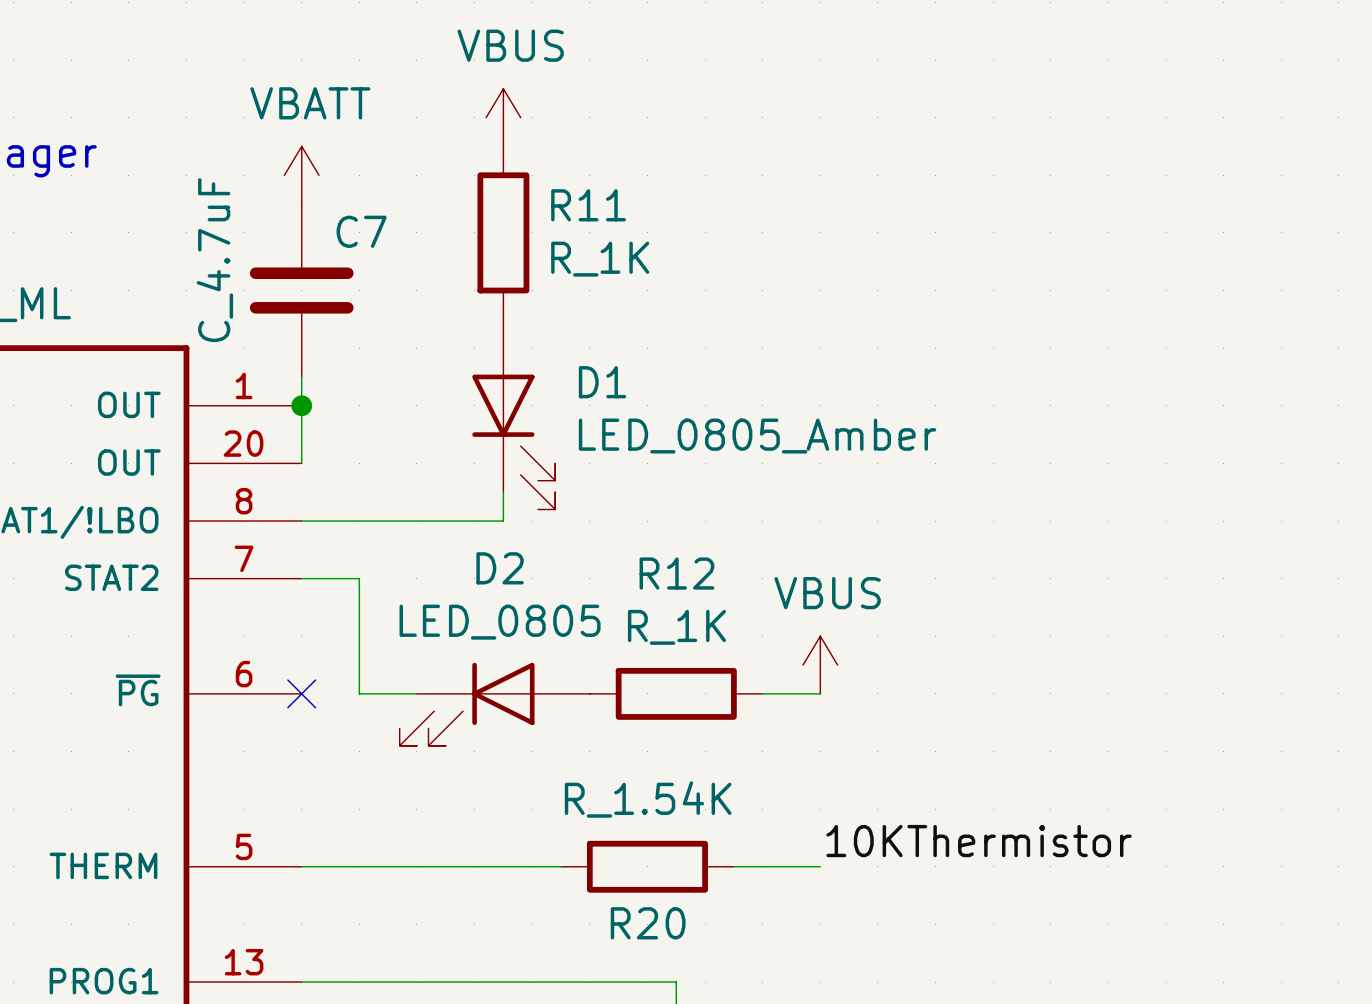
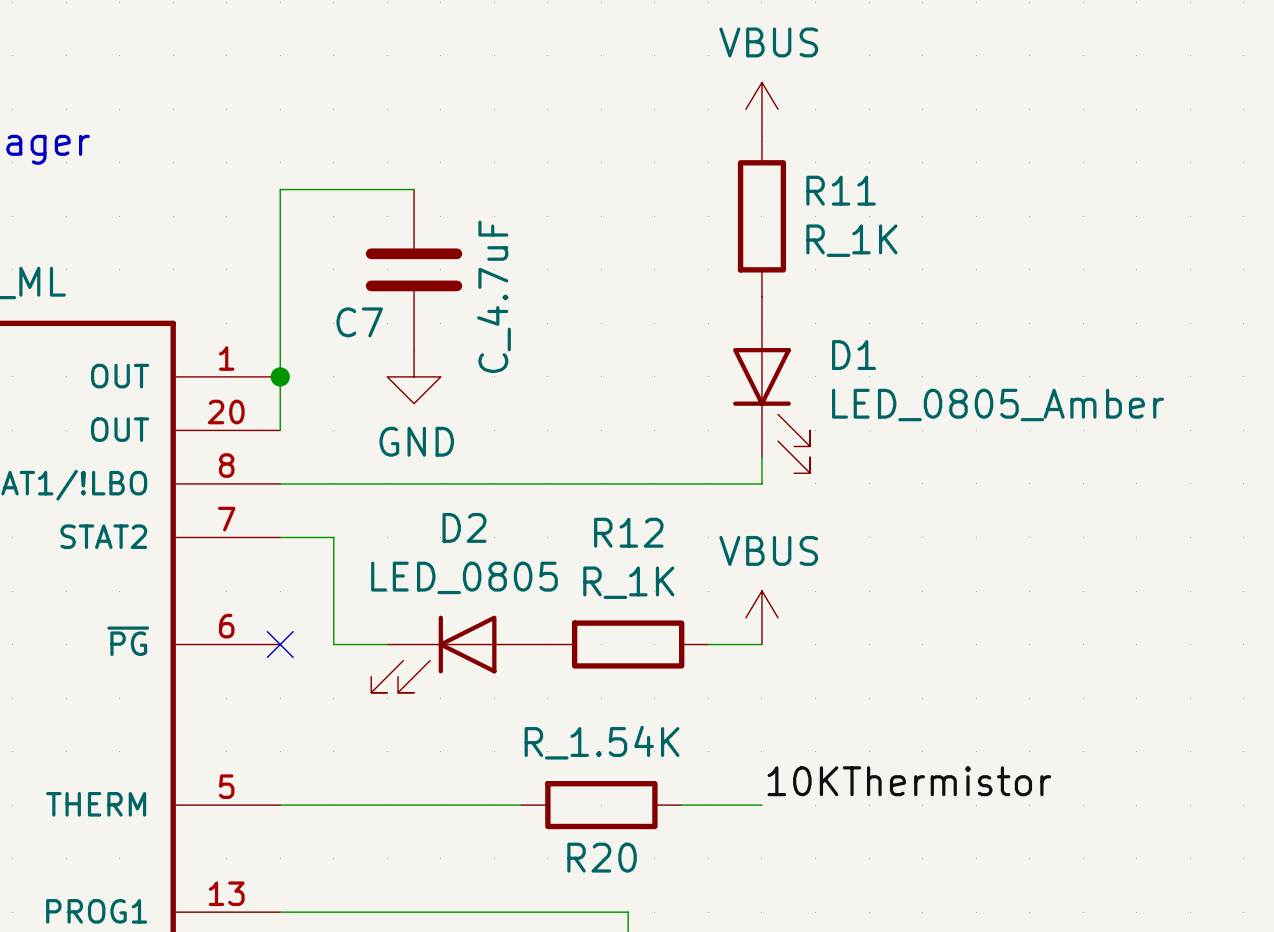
power symbol position: VBUS (503, 117) -> VBUS (761, 109)
power symbol: VBATT (301, 175) -> none
wire: none -> (414, 189) (280, 189) (280, 350)
C7 name position: C7 (361, 231) -> C7 (359, 322)
R11 position: (503, 232) -> (761, 216)
C7 value position: C_4.7uF (214, 260) -> C_4.7uF (493, 296)
C7 position: (301, 290) -> (414, 269)
power symbol: none -> GND (414, 376)
D1 position: (513, 414) -> (771, 384)
wire: (503, 492) (503, 521) -> (761, 457) (761, 483) (467, 483)

